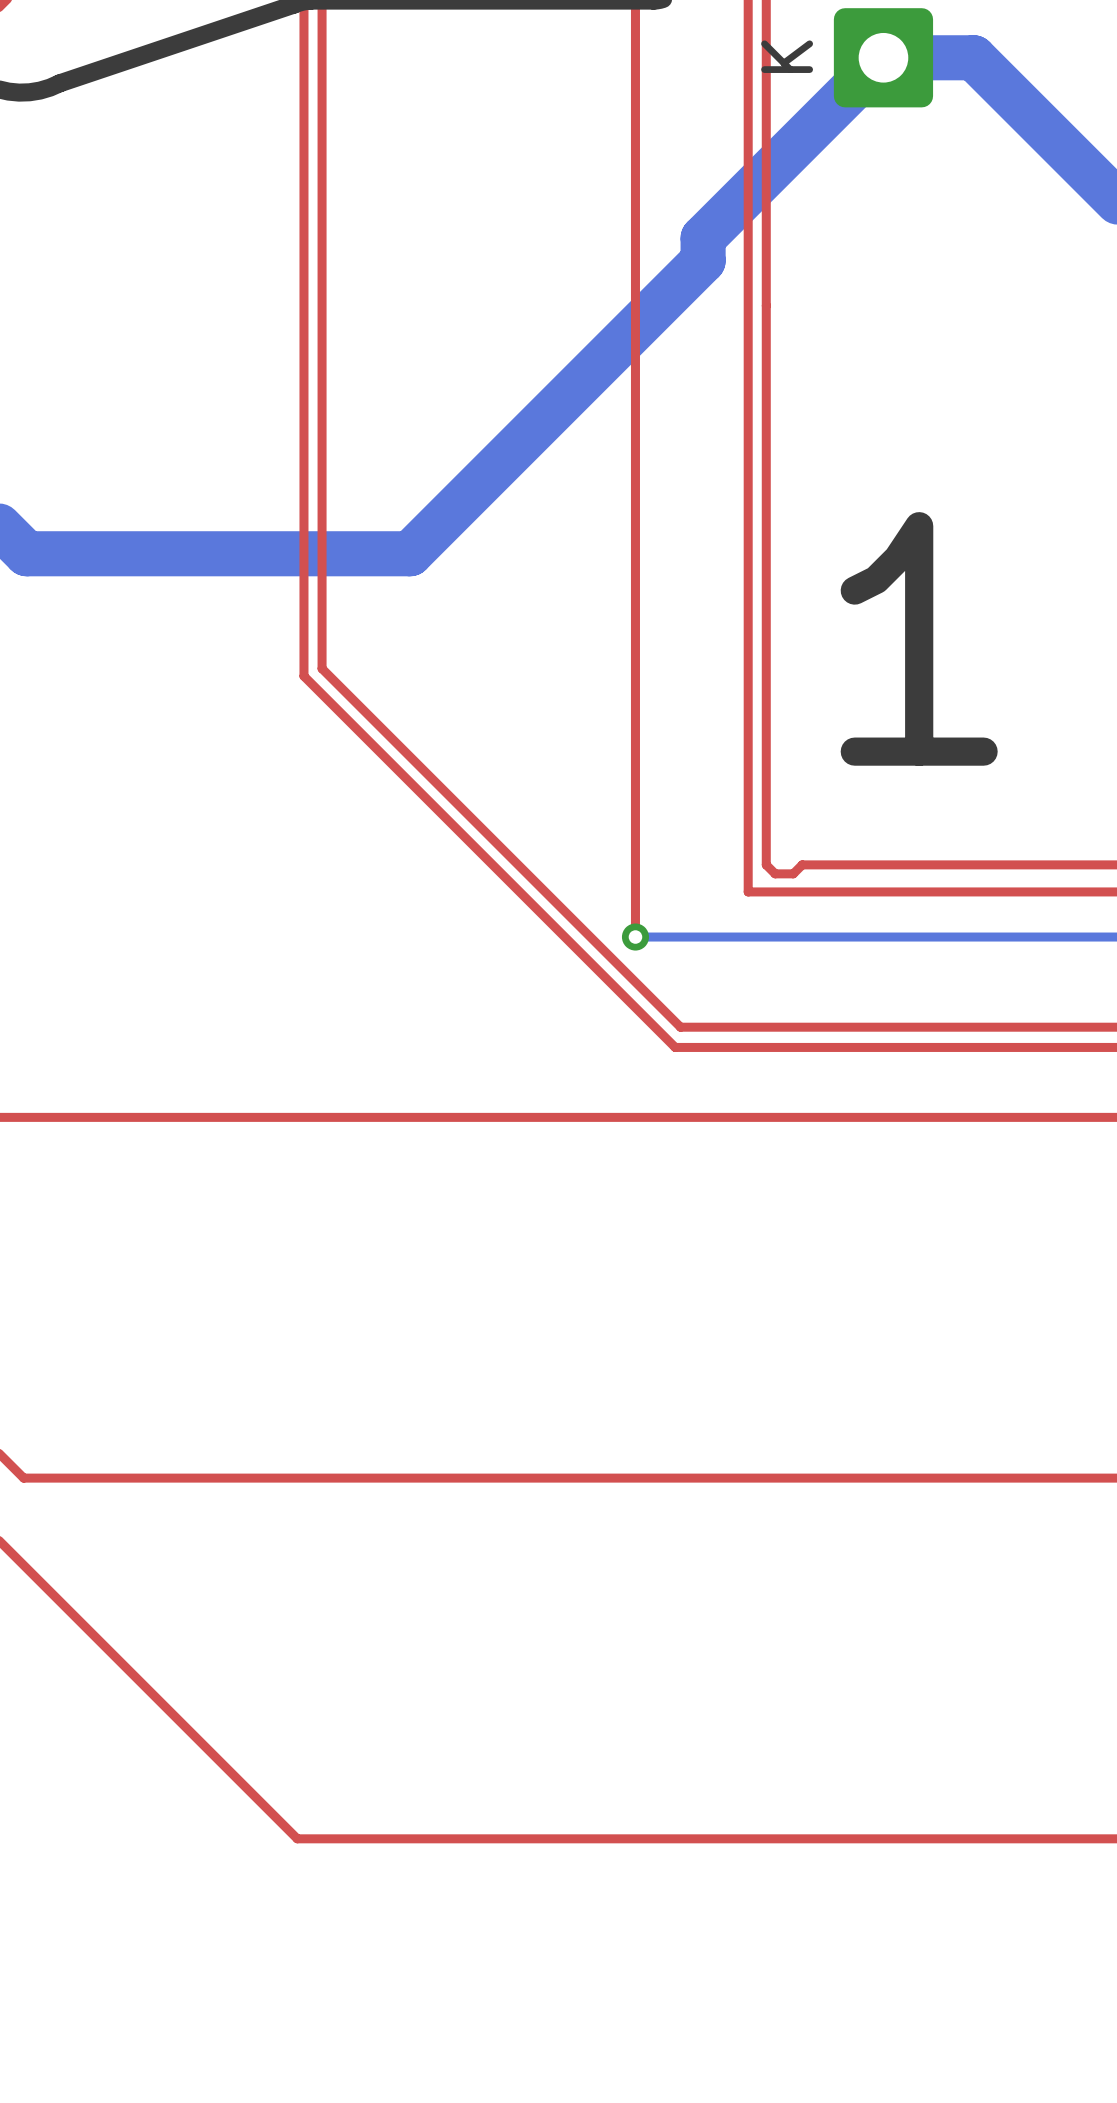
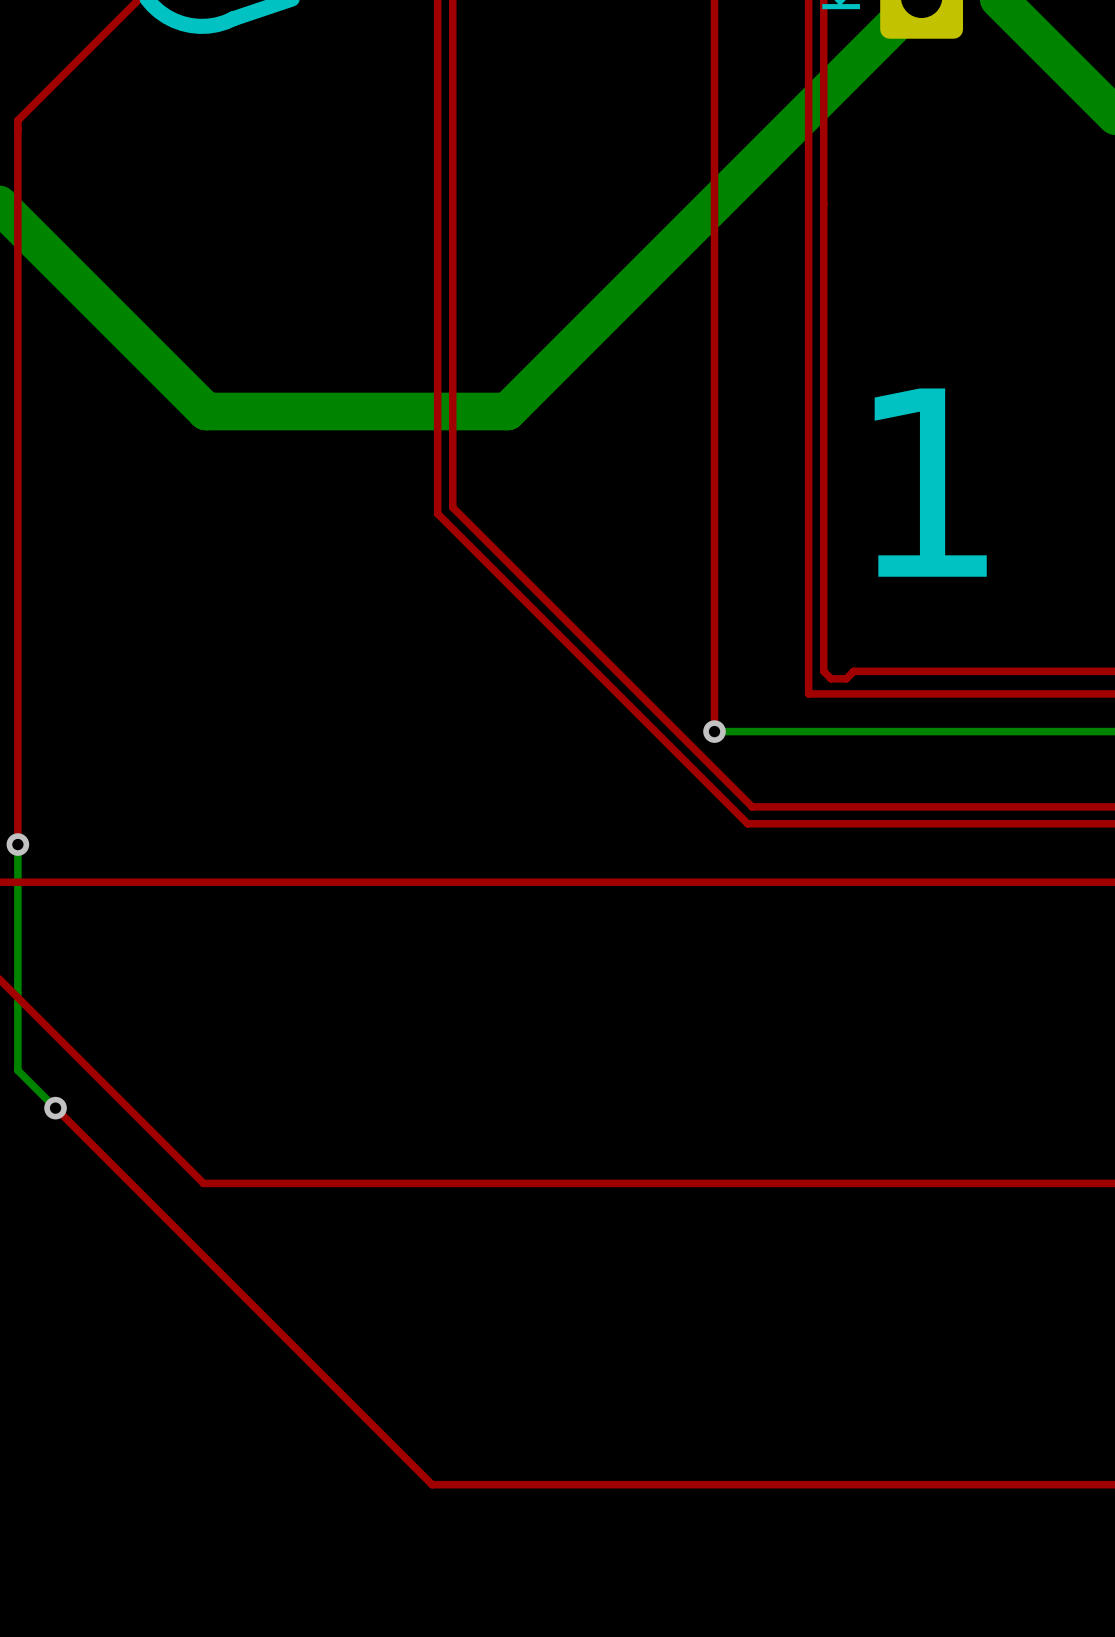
bottom track: (703, 238) (703, 260) (410, 553) (387, 553) -> (770, 147) (507, 411)

